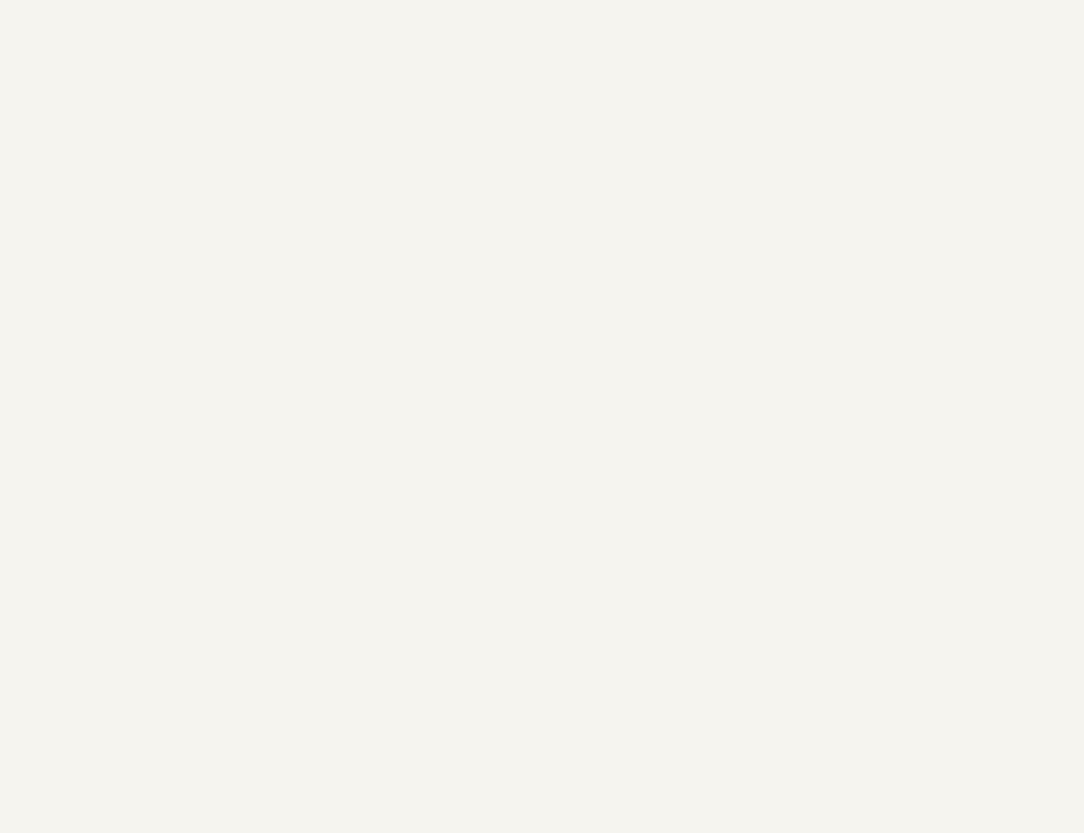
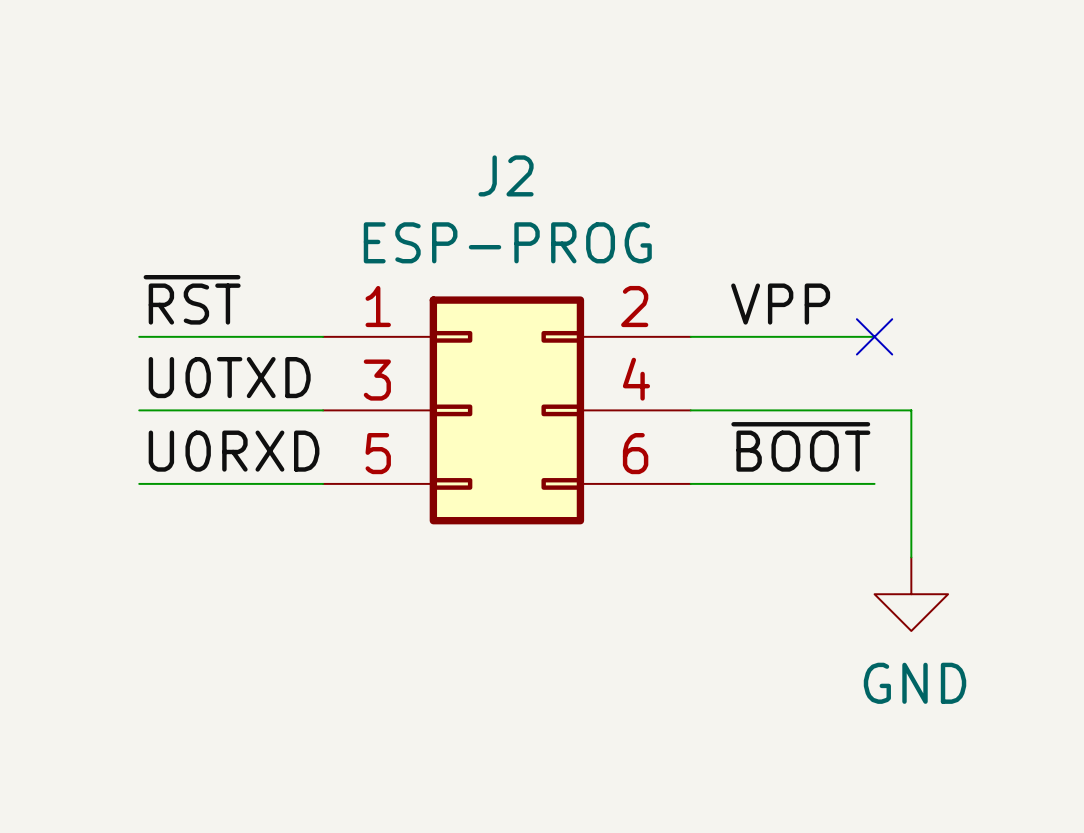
label: none -> ~{RST} (192, 299)
label: none -> VPP (780, 304)
wire: none -> (139, 336) (323, 336)
wire: none -> (690, 336) (874, 336)
no-connect mark: none -> (874, 336)
label: none -> U0TXD (229, 377)
wire: none -> (139, 410) (323, 410)
J2: none -> ESP-PROG (506, 410)
wire: none -> (690, 410) (911, 410) (911, 557)
label: none -> ~{BOOT} (800, 446)
label: none -> U0RXD (234, 451)
wire: none -> (139, 483) (323, 483)
wire: none -> (690, 483) (874, 483)
power symbol: none -> GND (911, 594)

